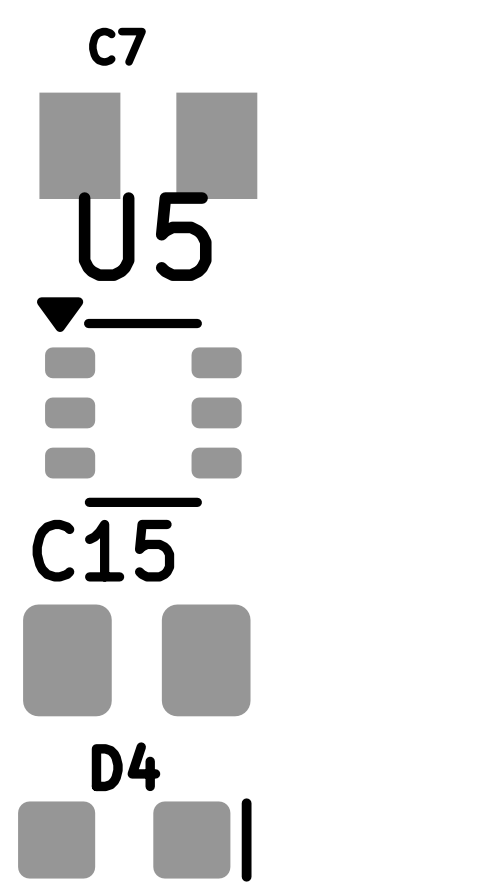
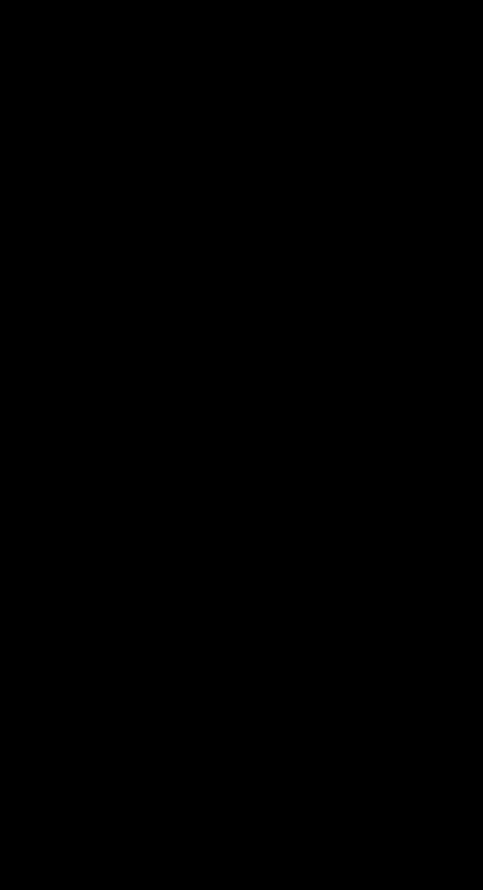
C7: (148, 145) -> none
U5: (139, 402) -> none
C15: (136, 660) -> none
D4: (134, 840) -> none

